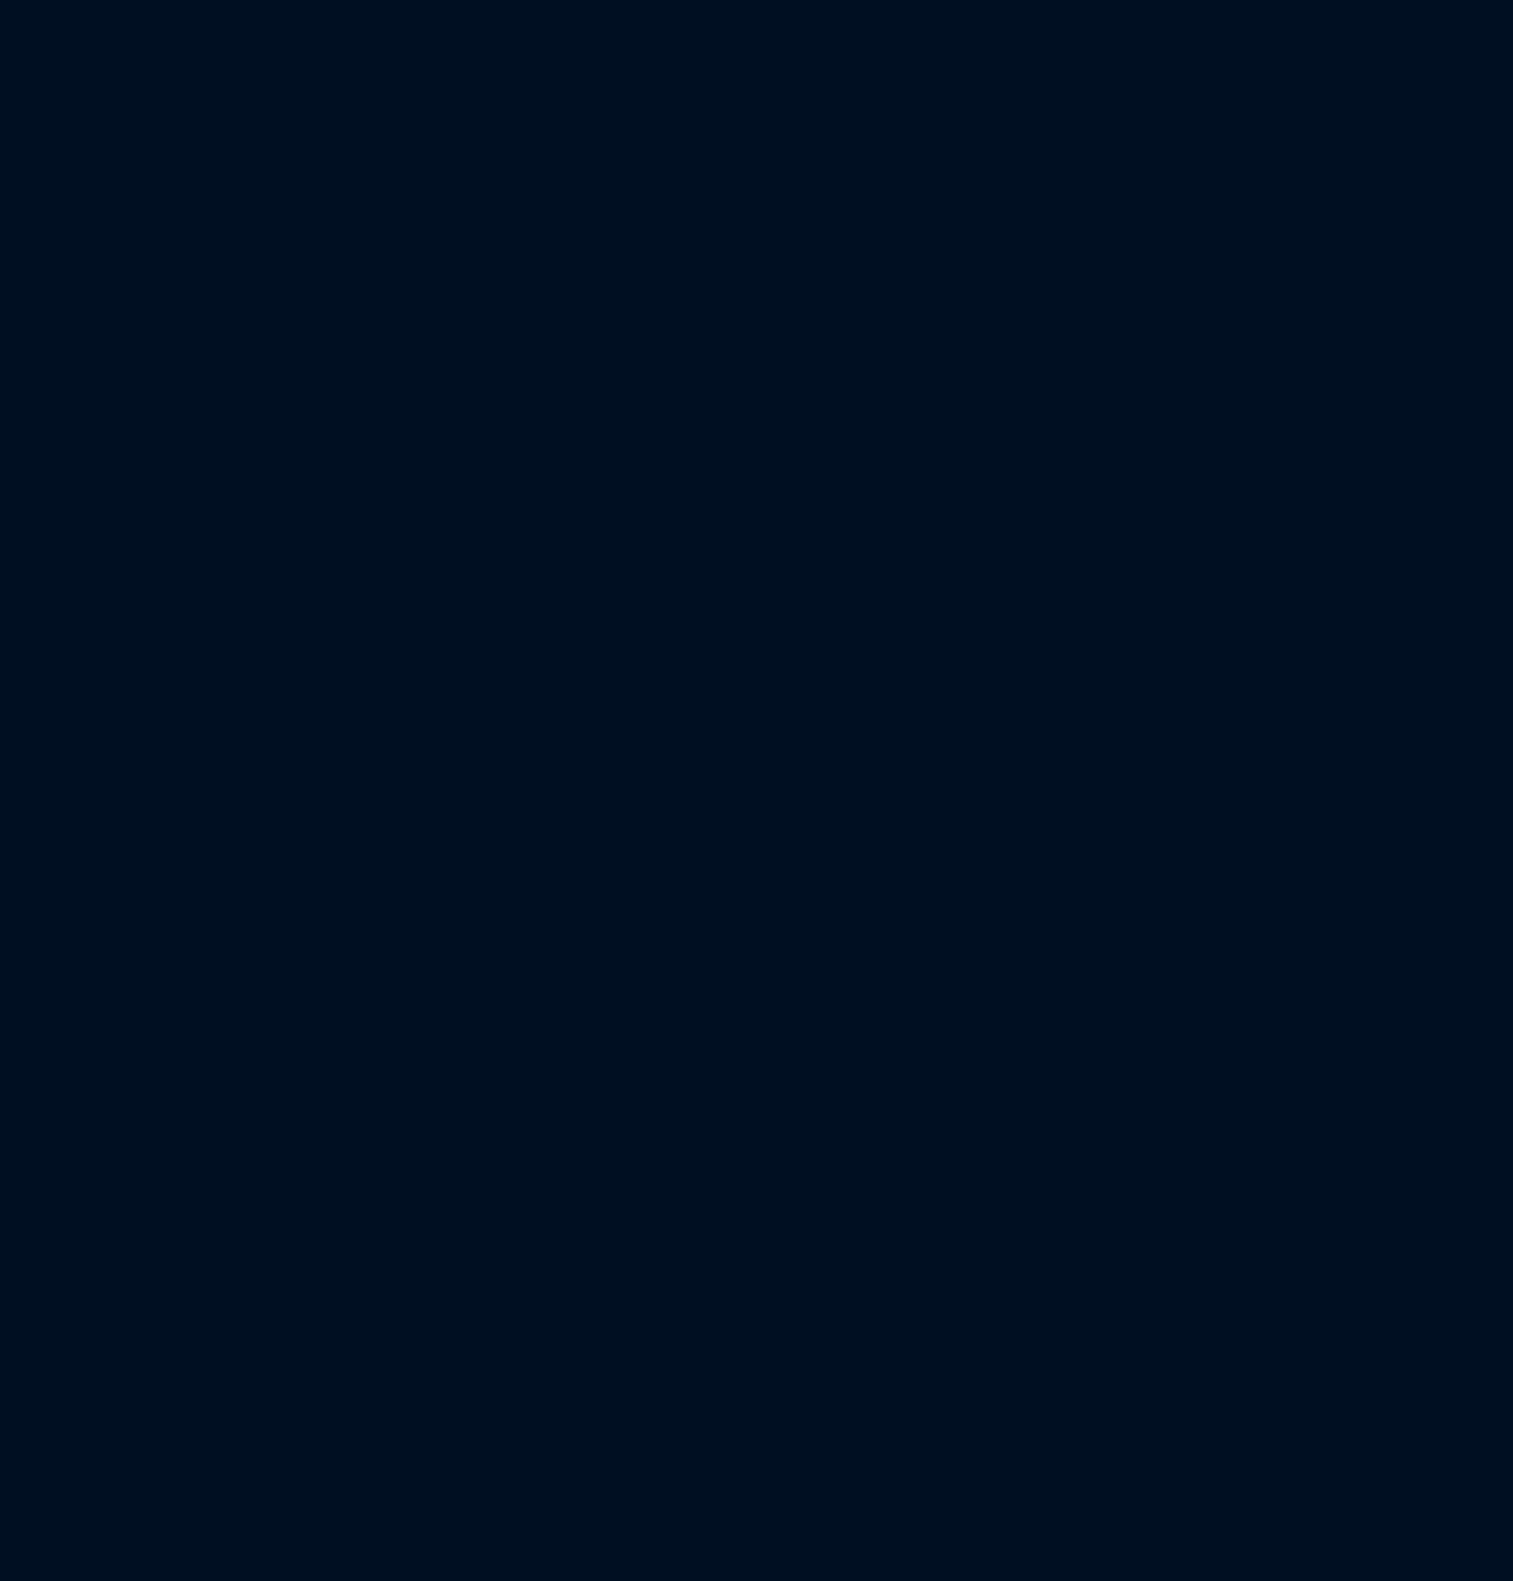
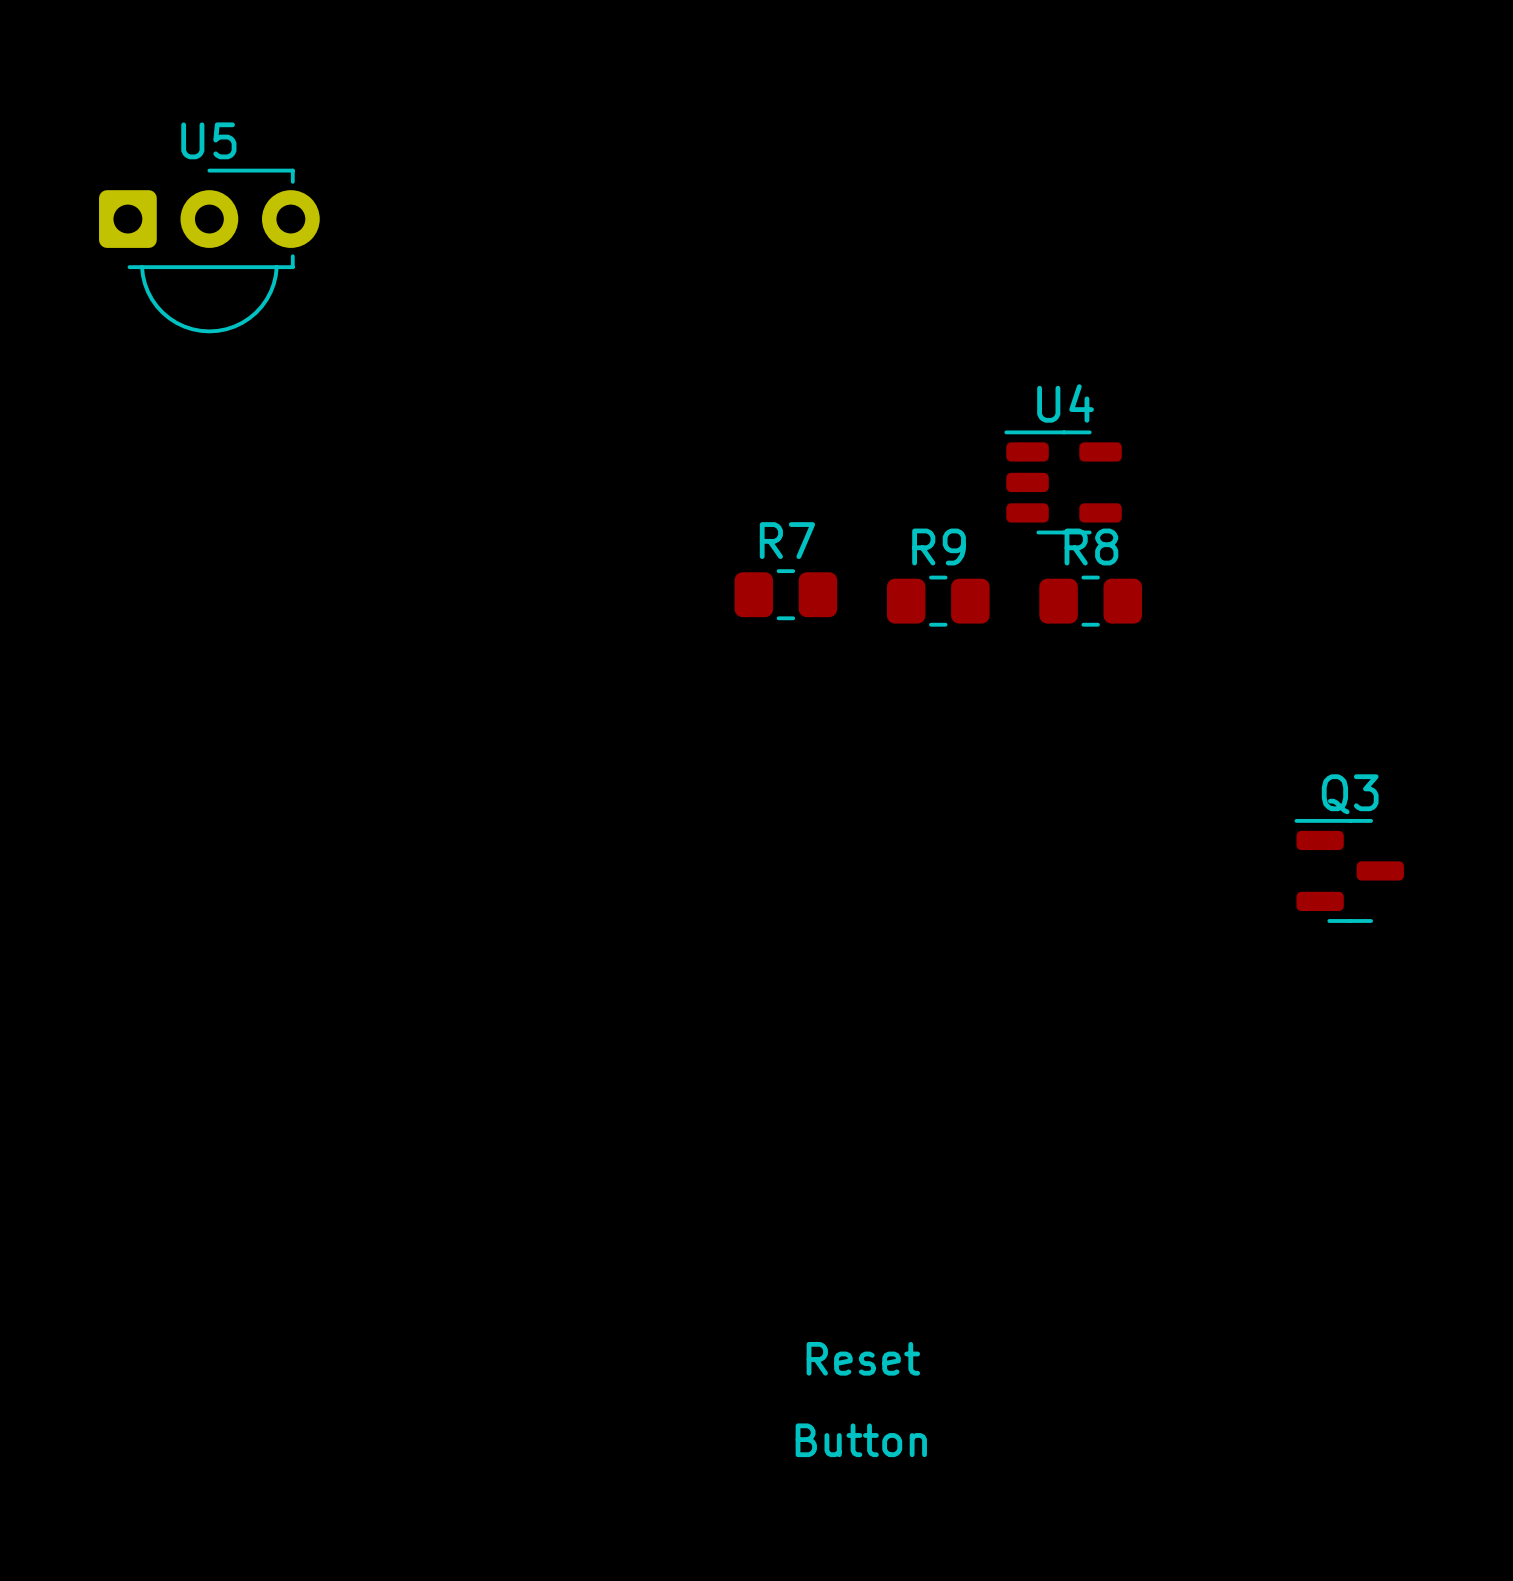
U5: none -> (209, 251)
U4: none -> (1063, 482)
R7: none -> (785, 594)
R9: none -> (938, 601)
R8: none -> (1090, 601)
Q3: none -> (1349, 870)
text: none -> Reset (863, 1358)
text: none -> Button (861, 1440)

